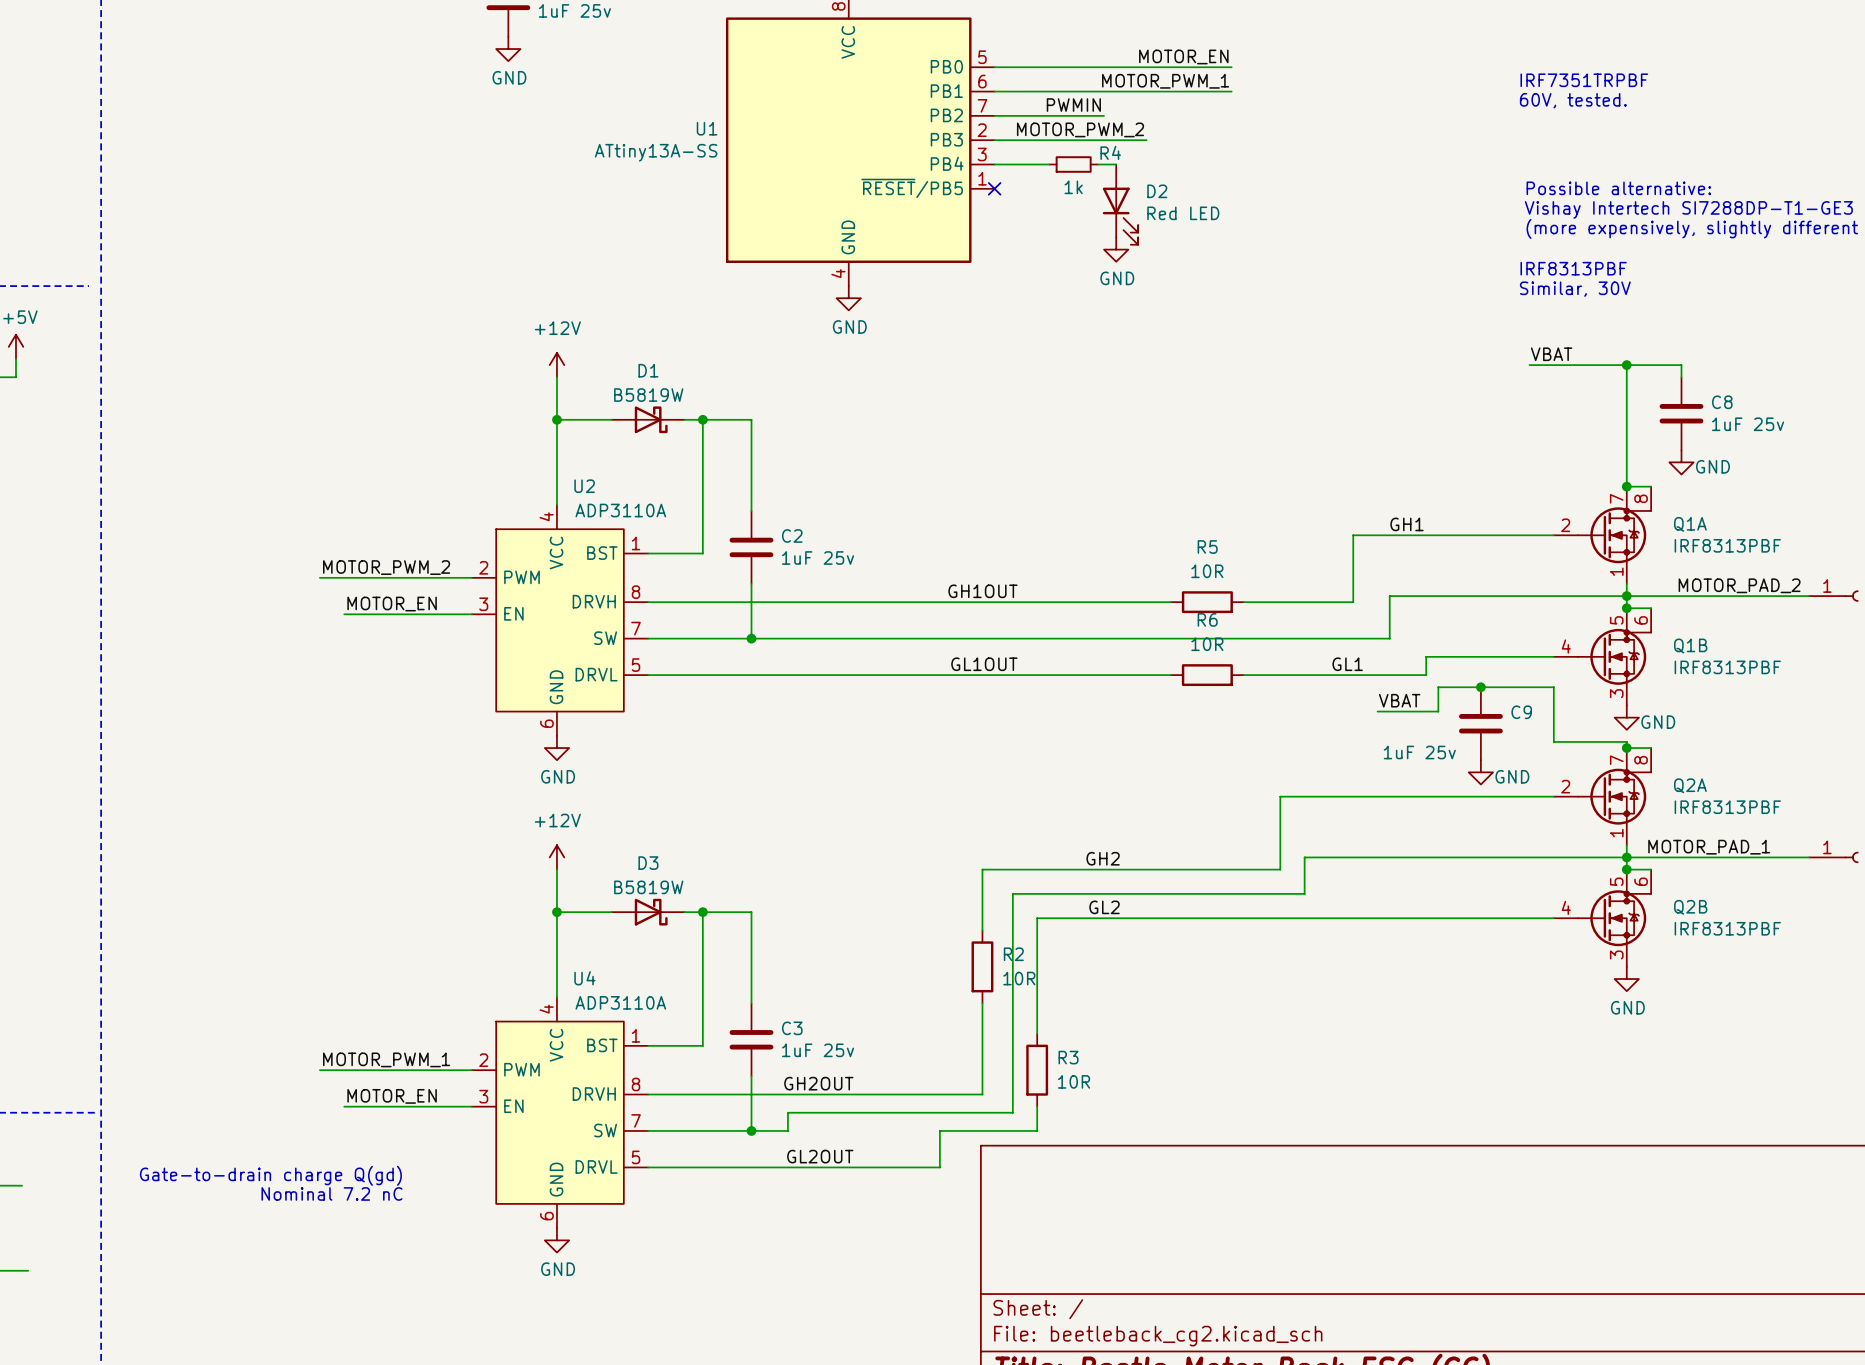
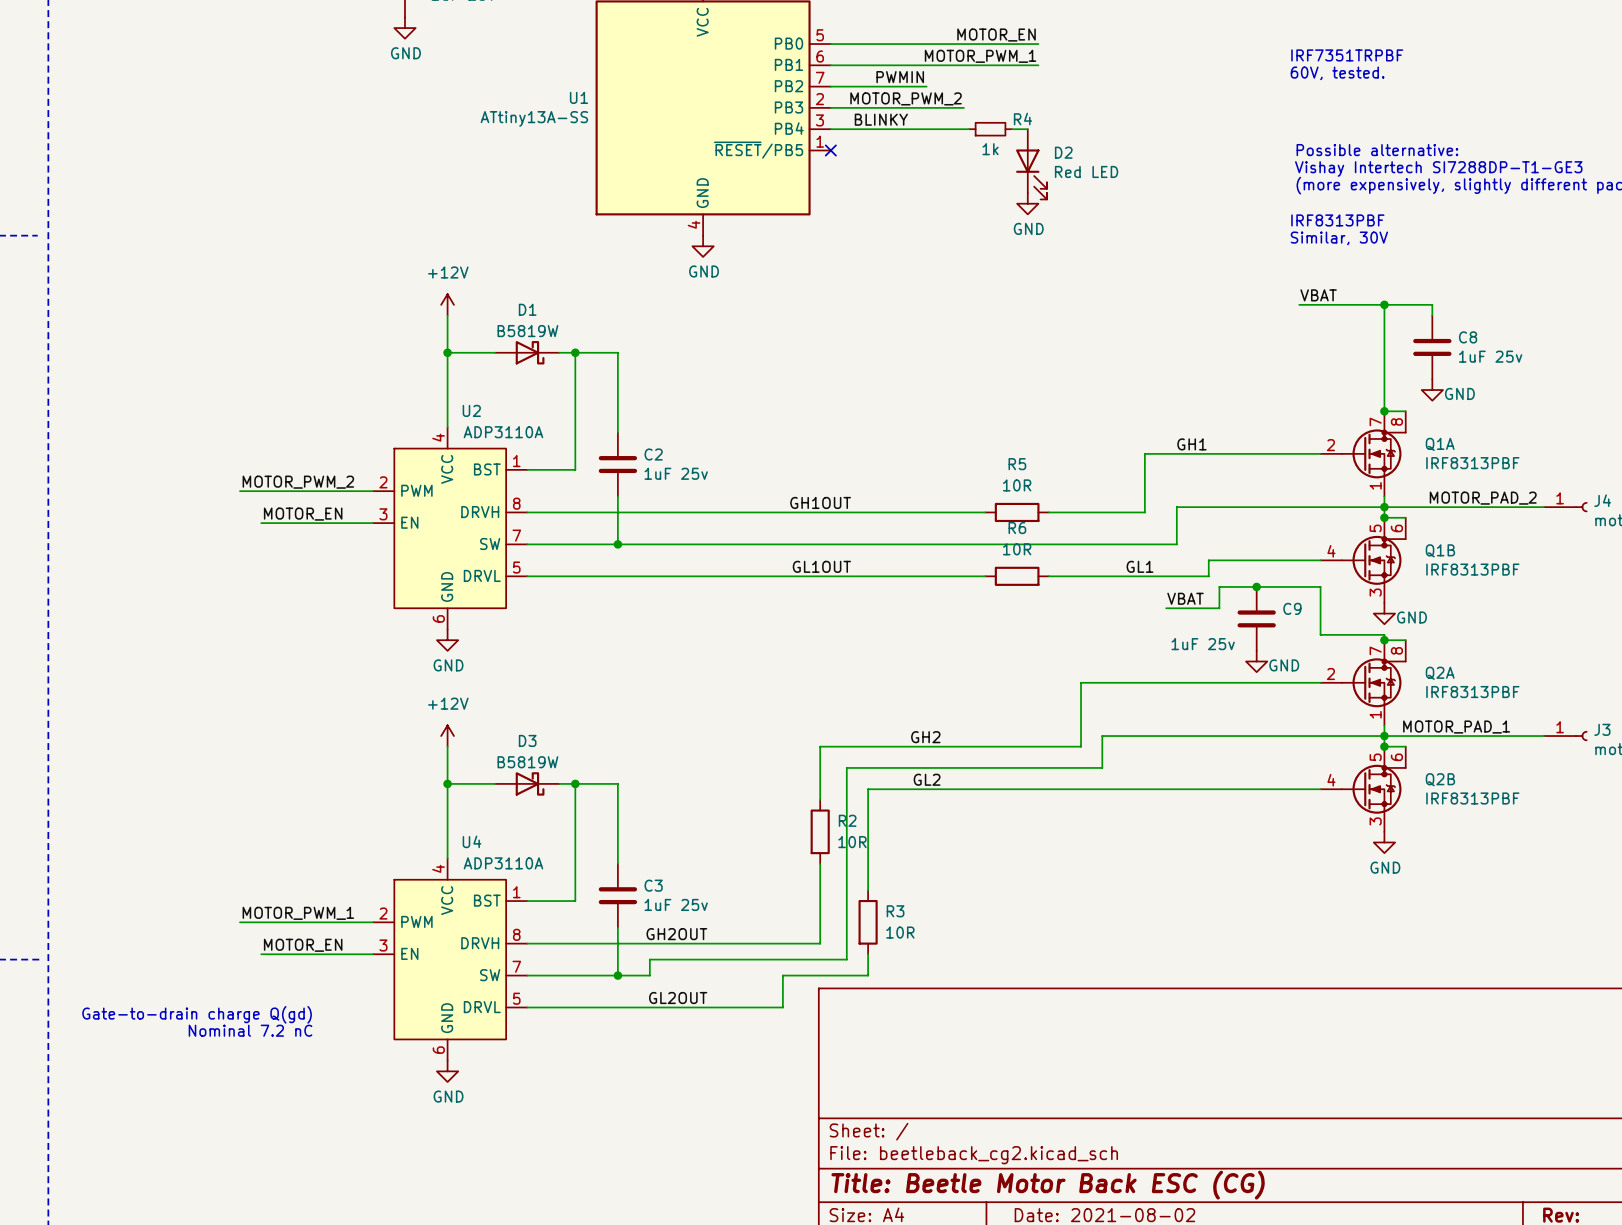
label: none -> BLINKY (881, 119)
wire: none -> (878, 129) (921, 129)
R4 position: (1073, 164) -> (990, 129)
wire: none -> (937, 129) (969, 129)
wire: none -> (1011, 129) (1027, 129)
D2 position: (1120, 204) -> (1031, 164)
power symbol position: GND (1116, 249) -> GND (1027, 203)

